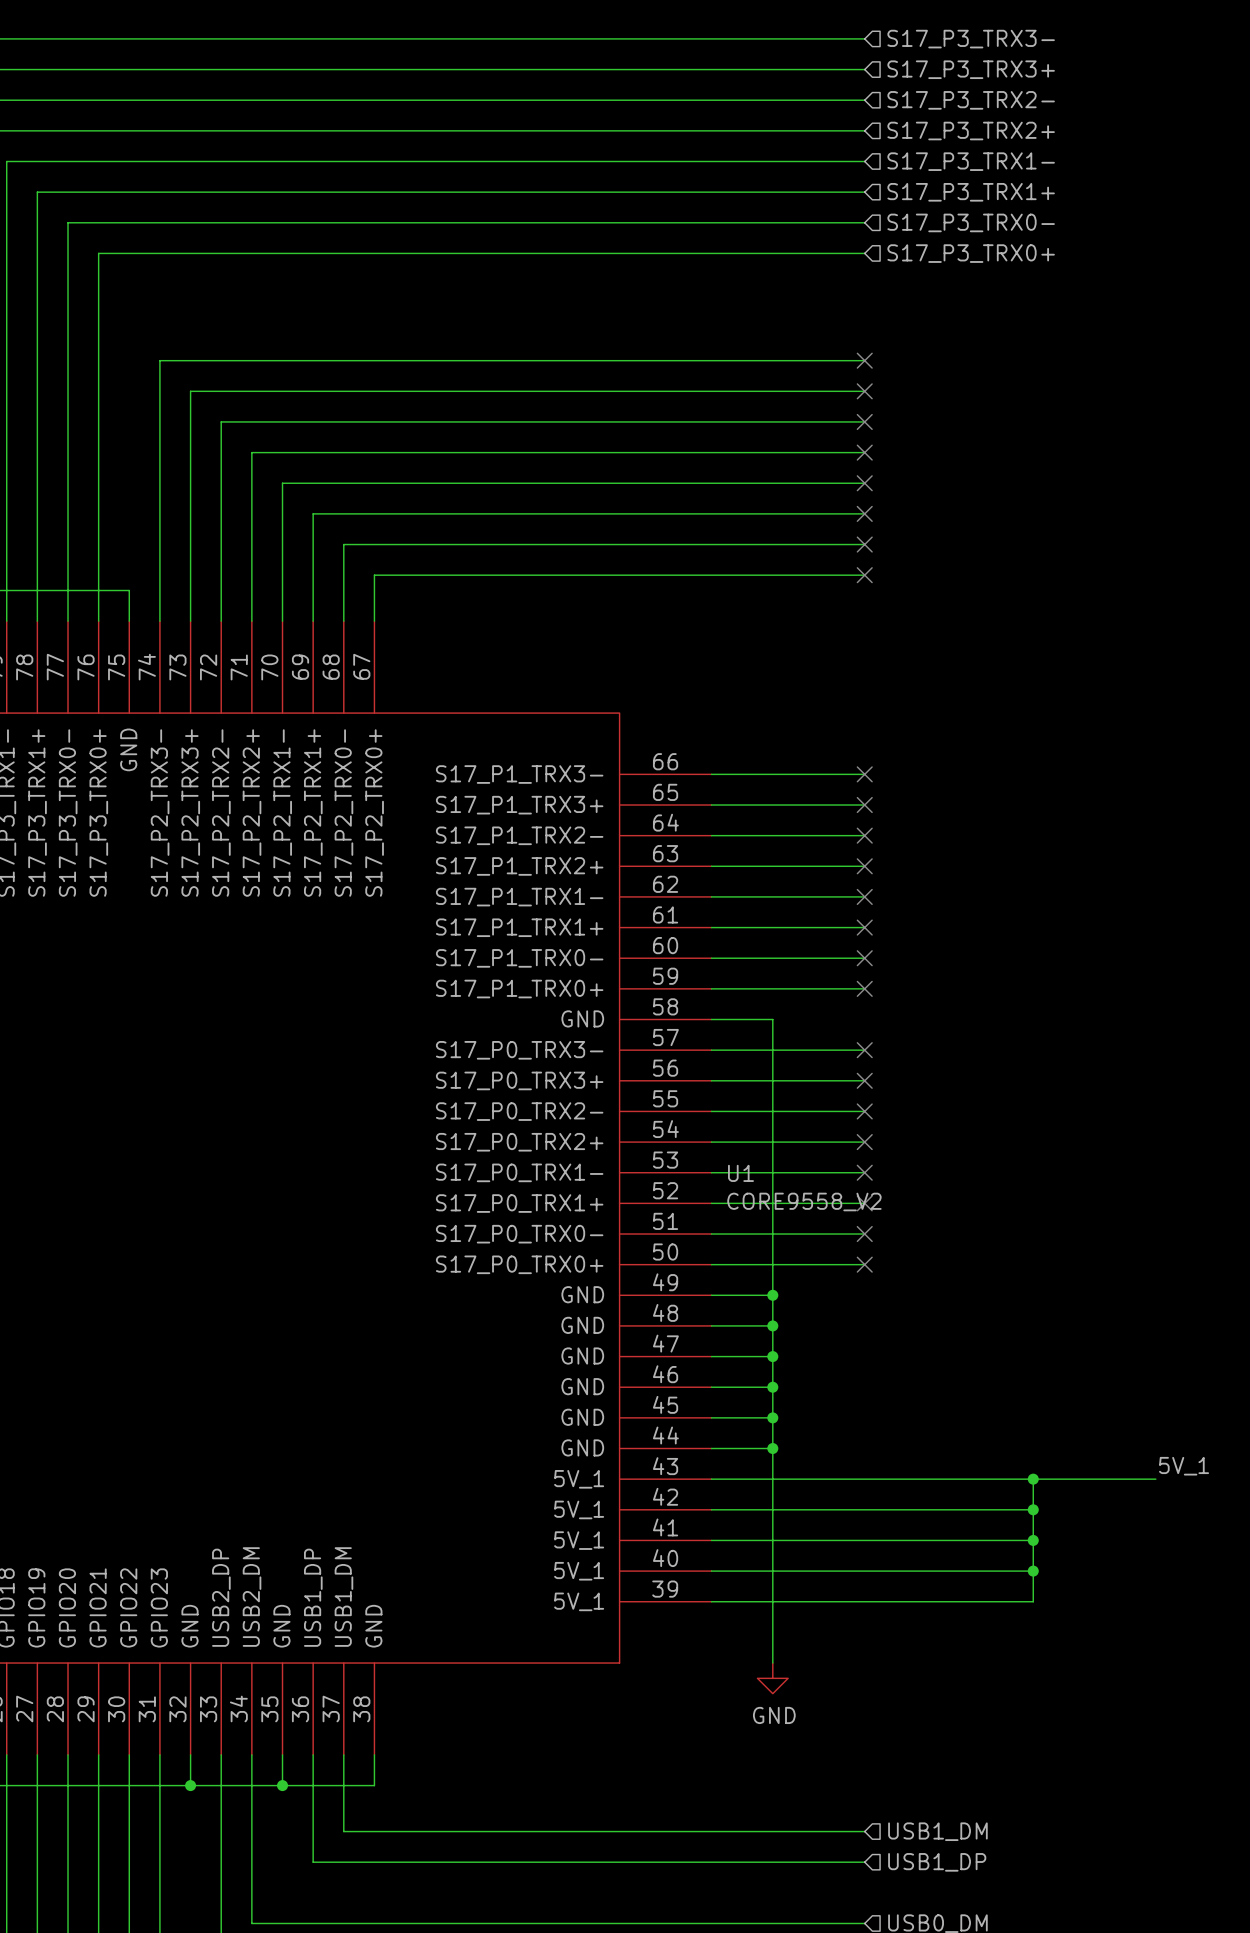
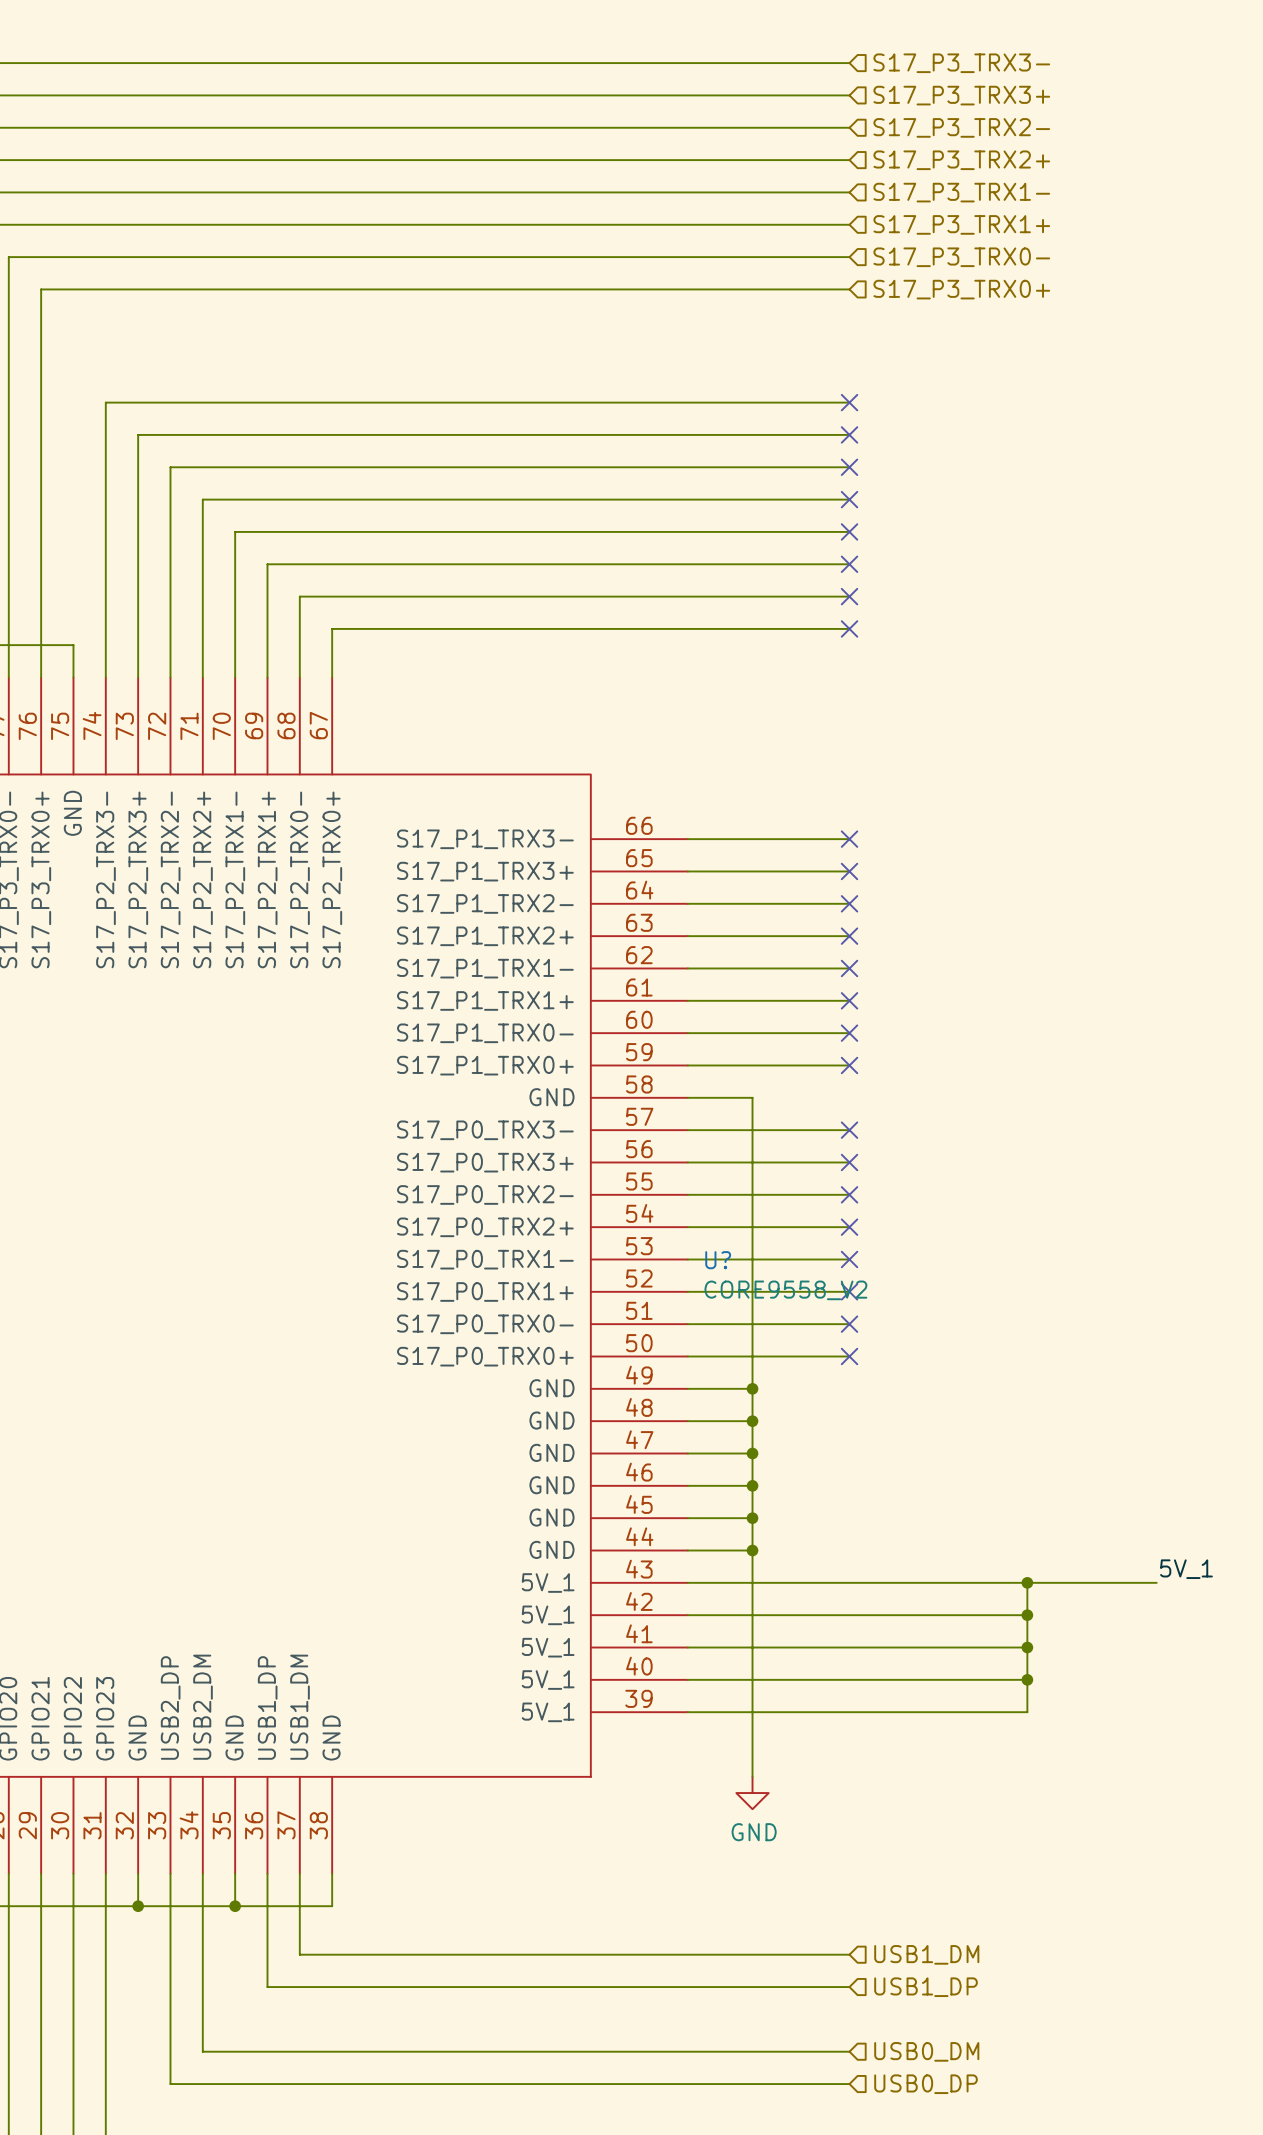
U1 name: U1 (740, 1173) -> U? (718, 1260)

